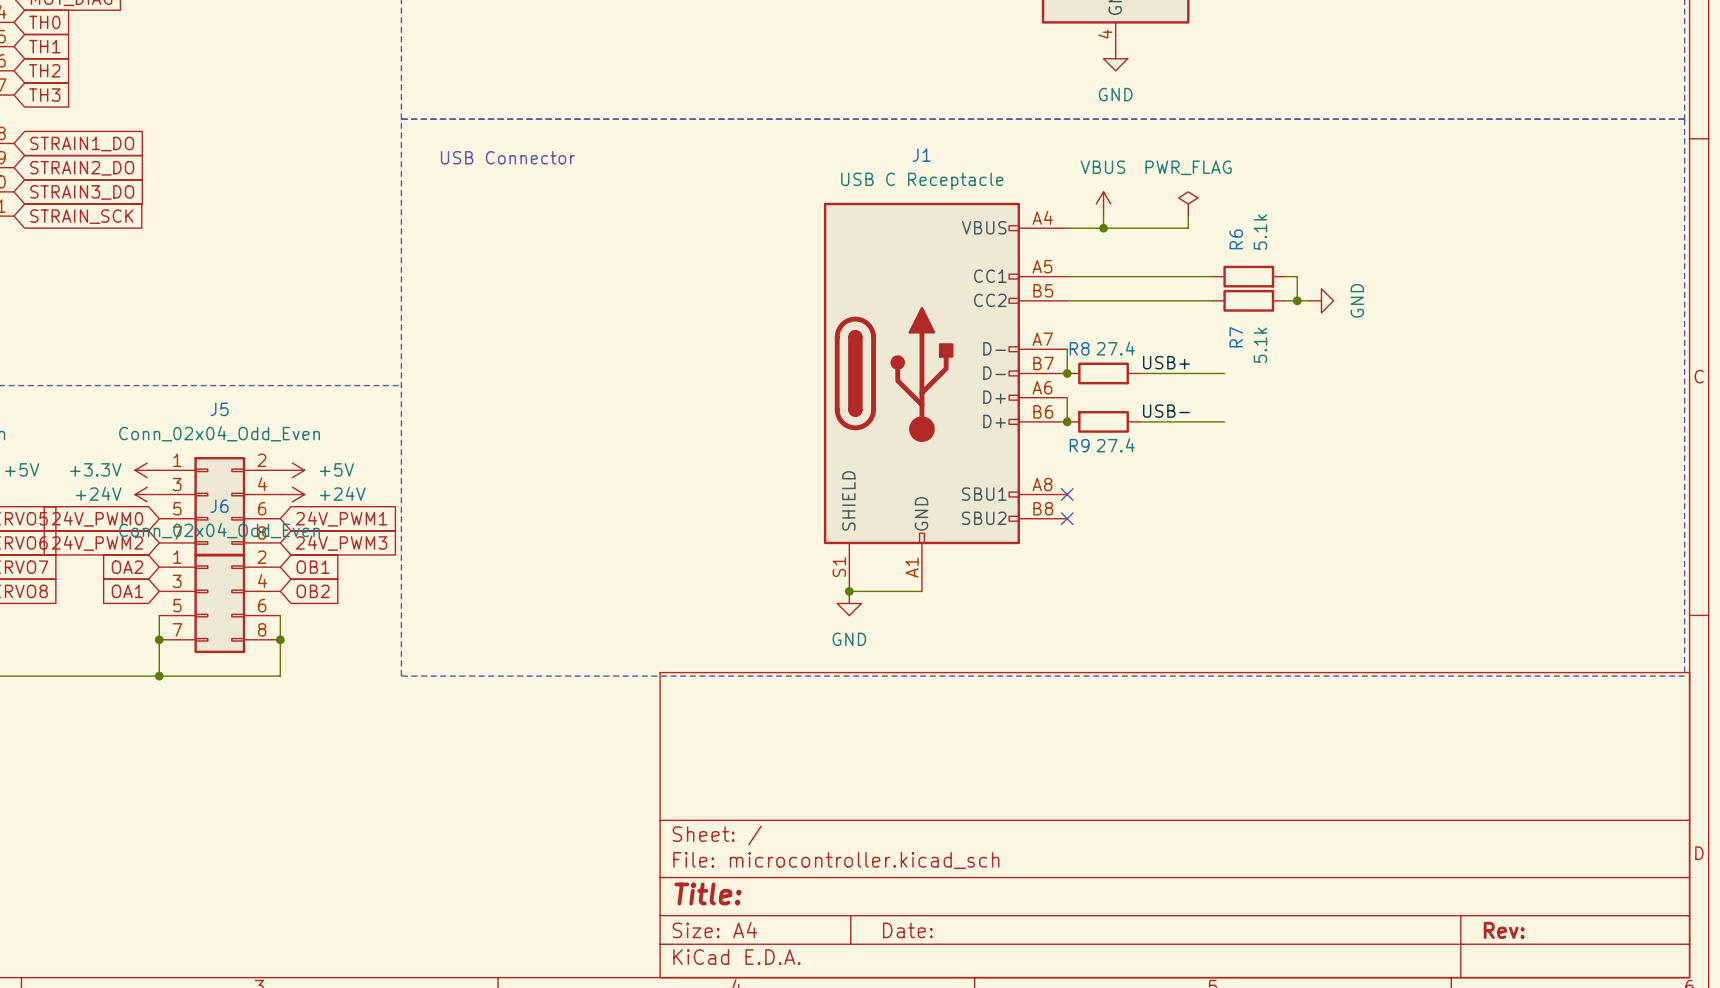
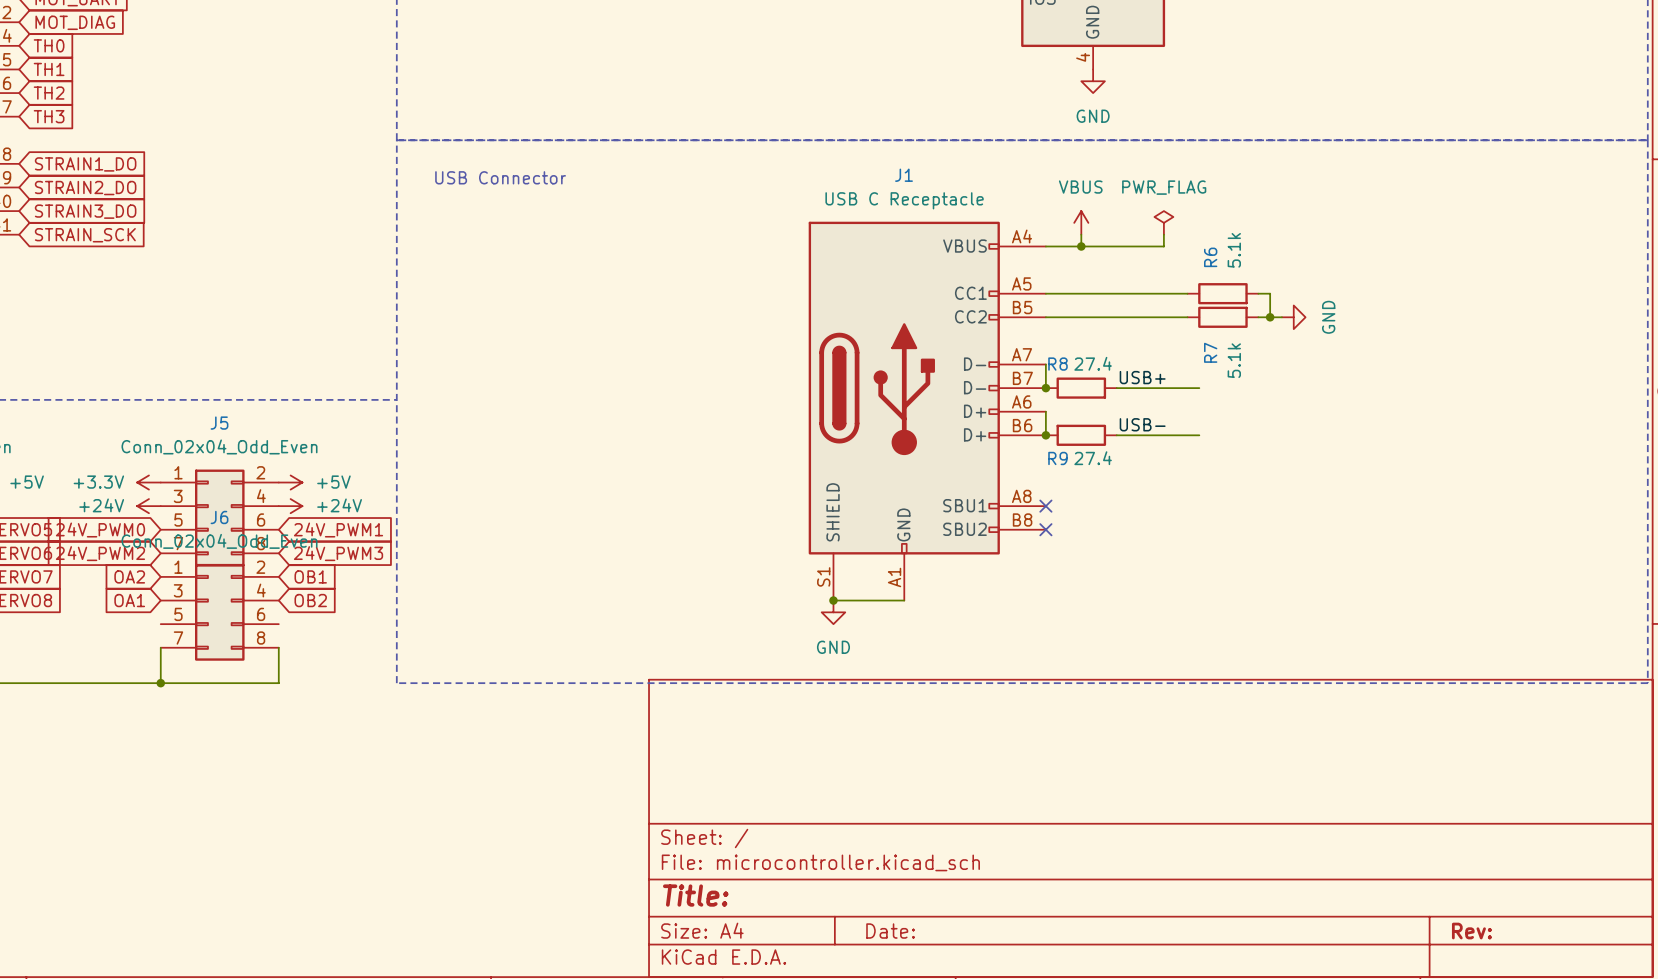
wire: (159, 615) (159, 639) -> none
wire: (280, 615) (280, 639) -> none
junction: (159, 639) -> none
junction: (280, 639) -> none

